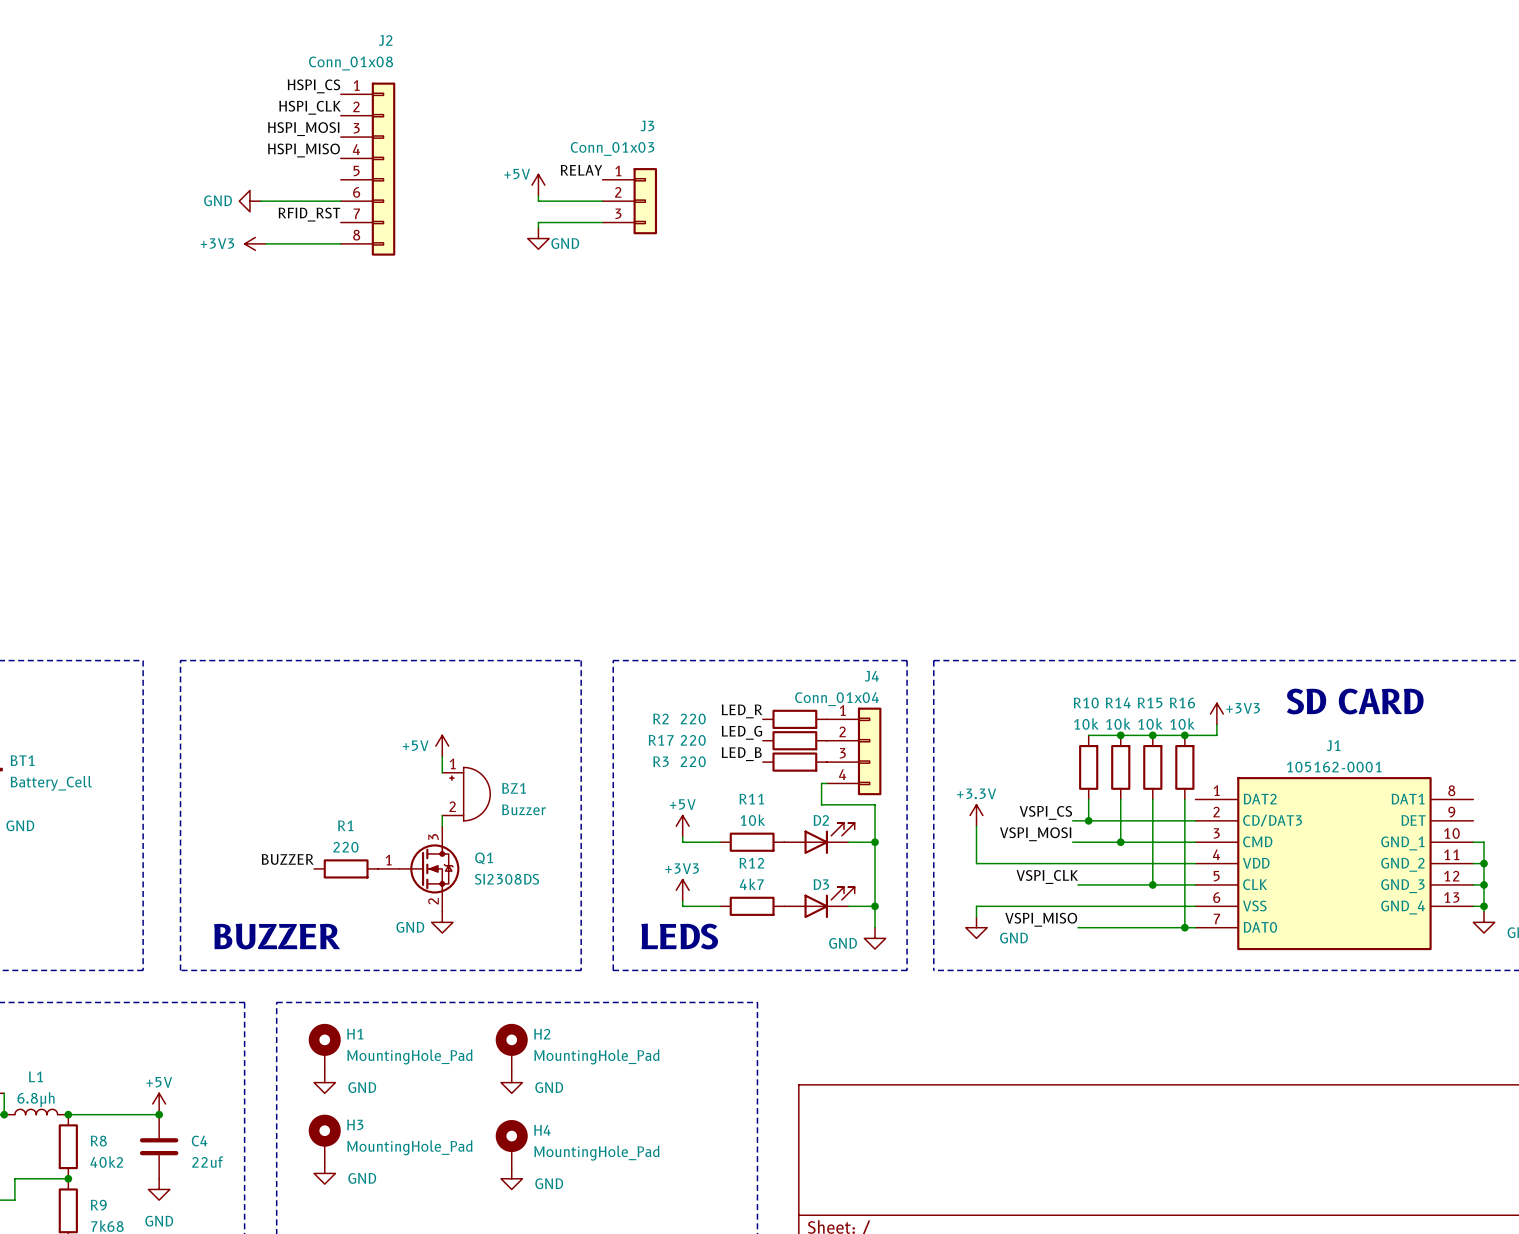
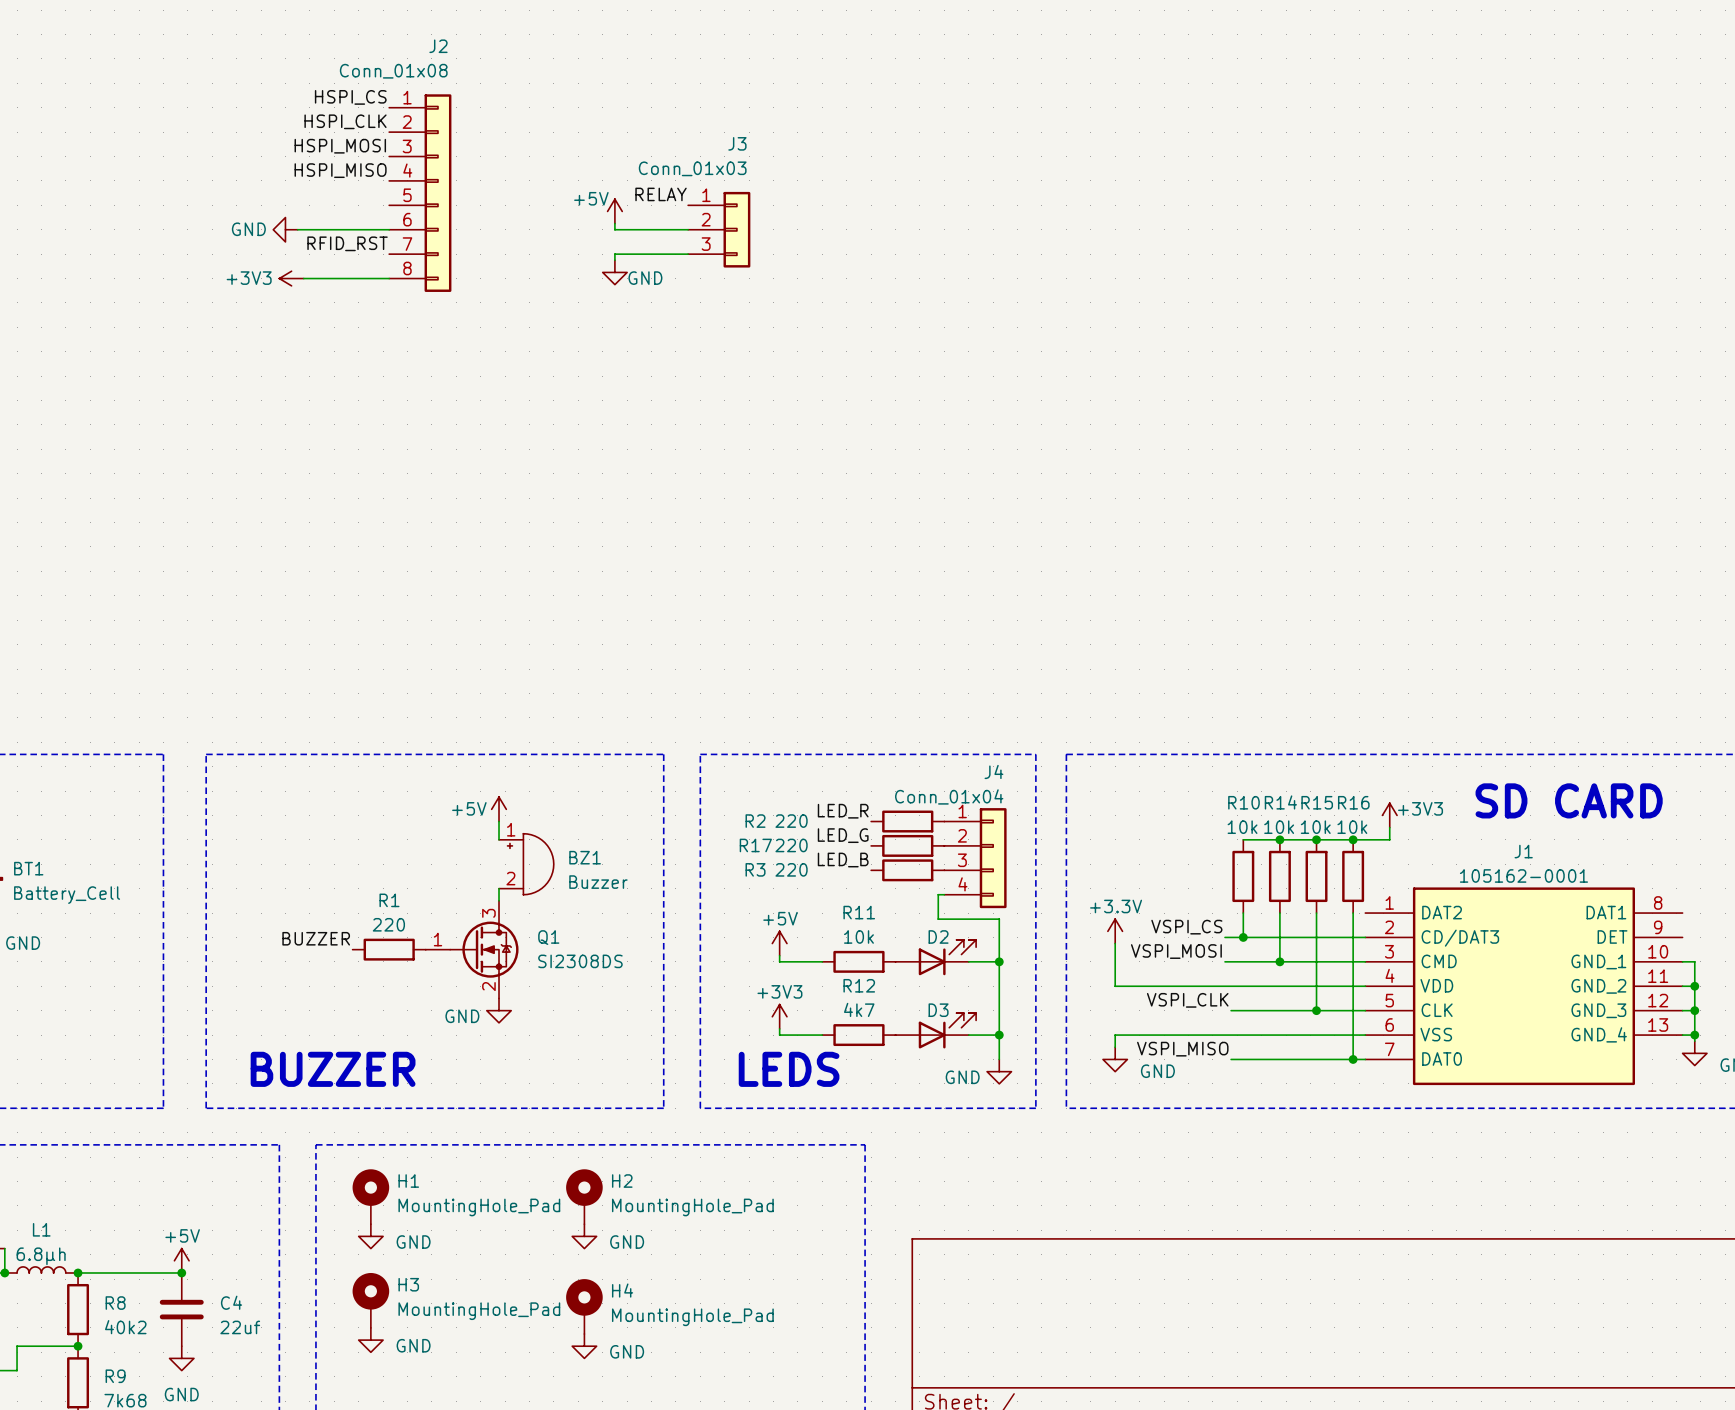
power symbol position: +5V (442, 746) -> +5V (499, 809)
wire: (442, 756) (442, 772) -> (499, 821) (499, 839)
BZ1 position: (466, 794) -> (526, 864)
wire: (442, 815) (442, 826) -> (499, 888) (499, 900)
label position: BUZZER (287, 859) -> BUZZER (316, 938)
R1 position: (346, 868) -> (389, 949)
Q1 position: (418, 868) -> (472, 949)
power symbol position: GND (442, 922) -> GND (499, 1010)

